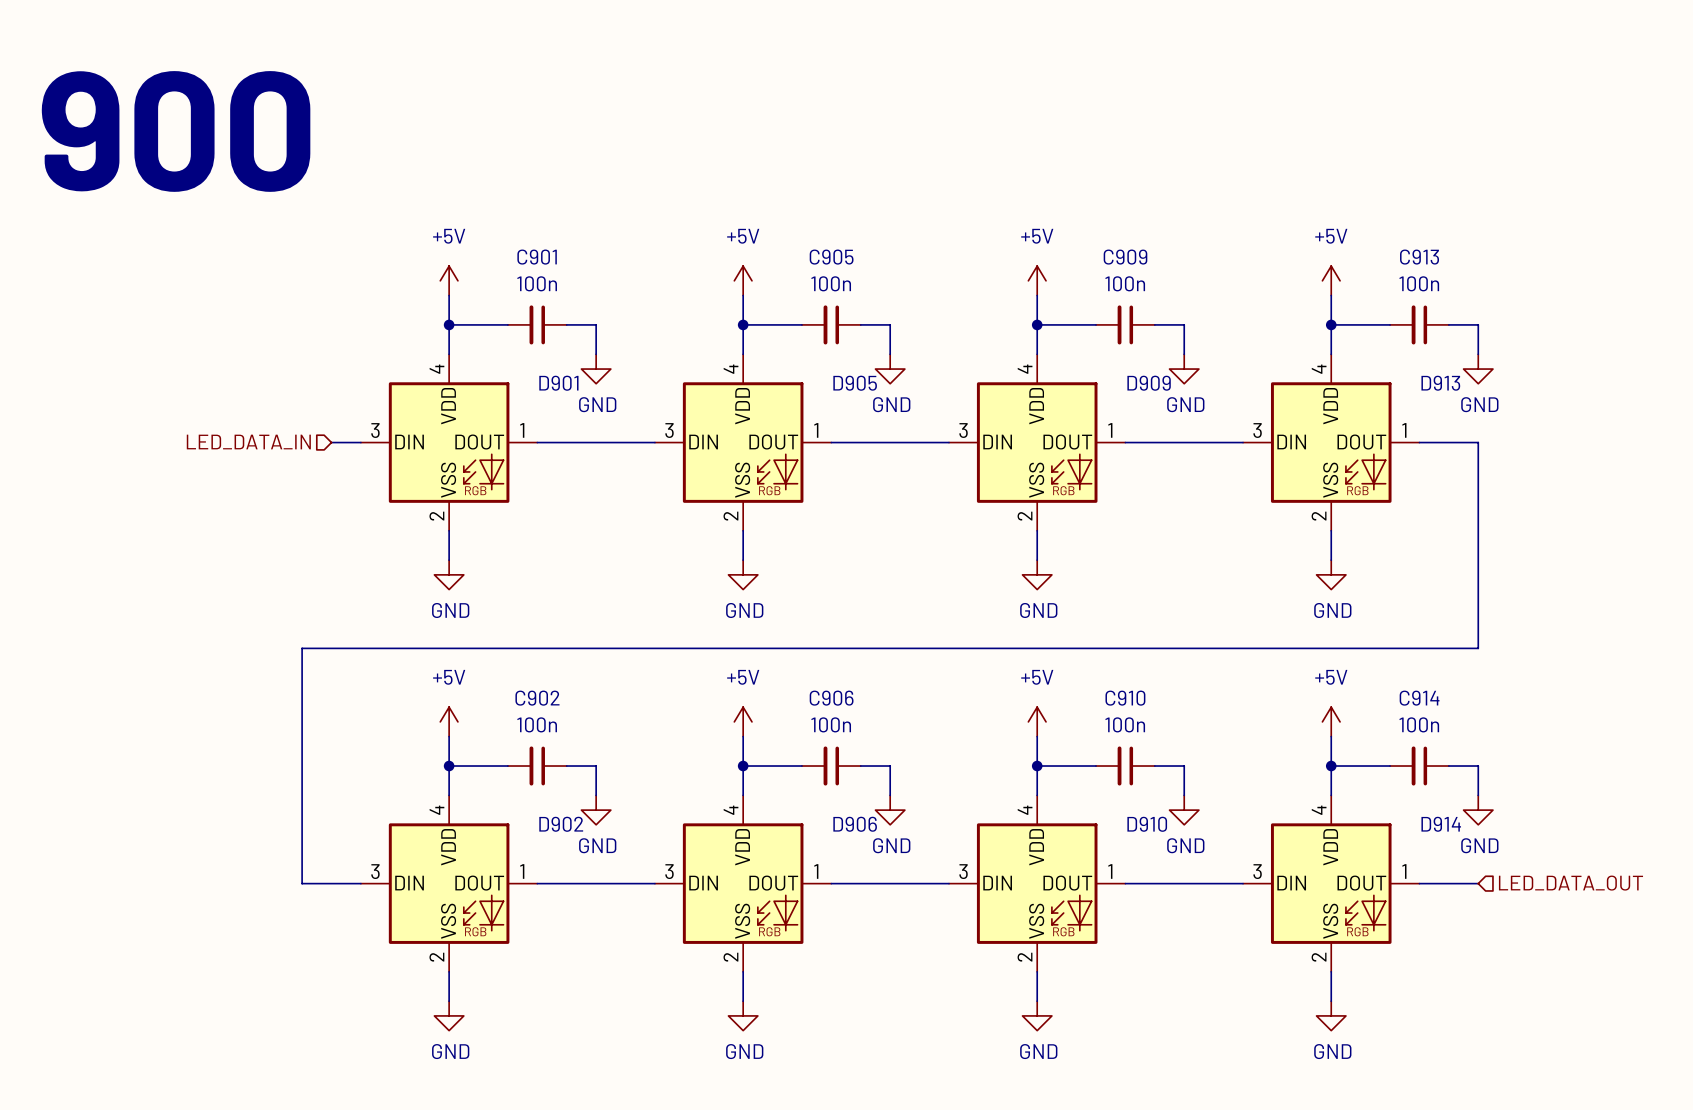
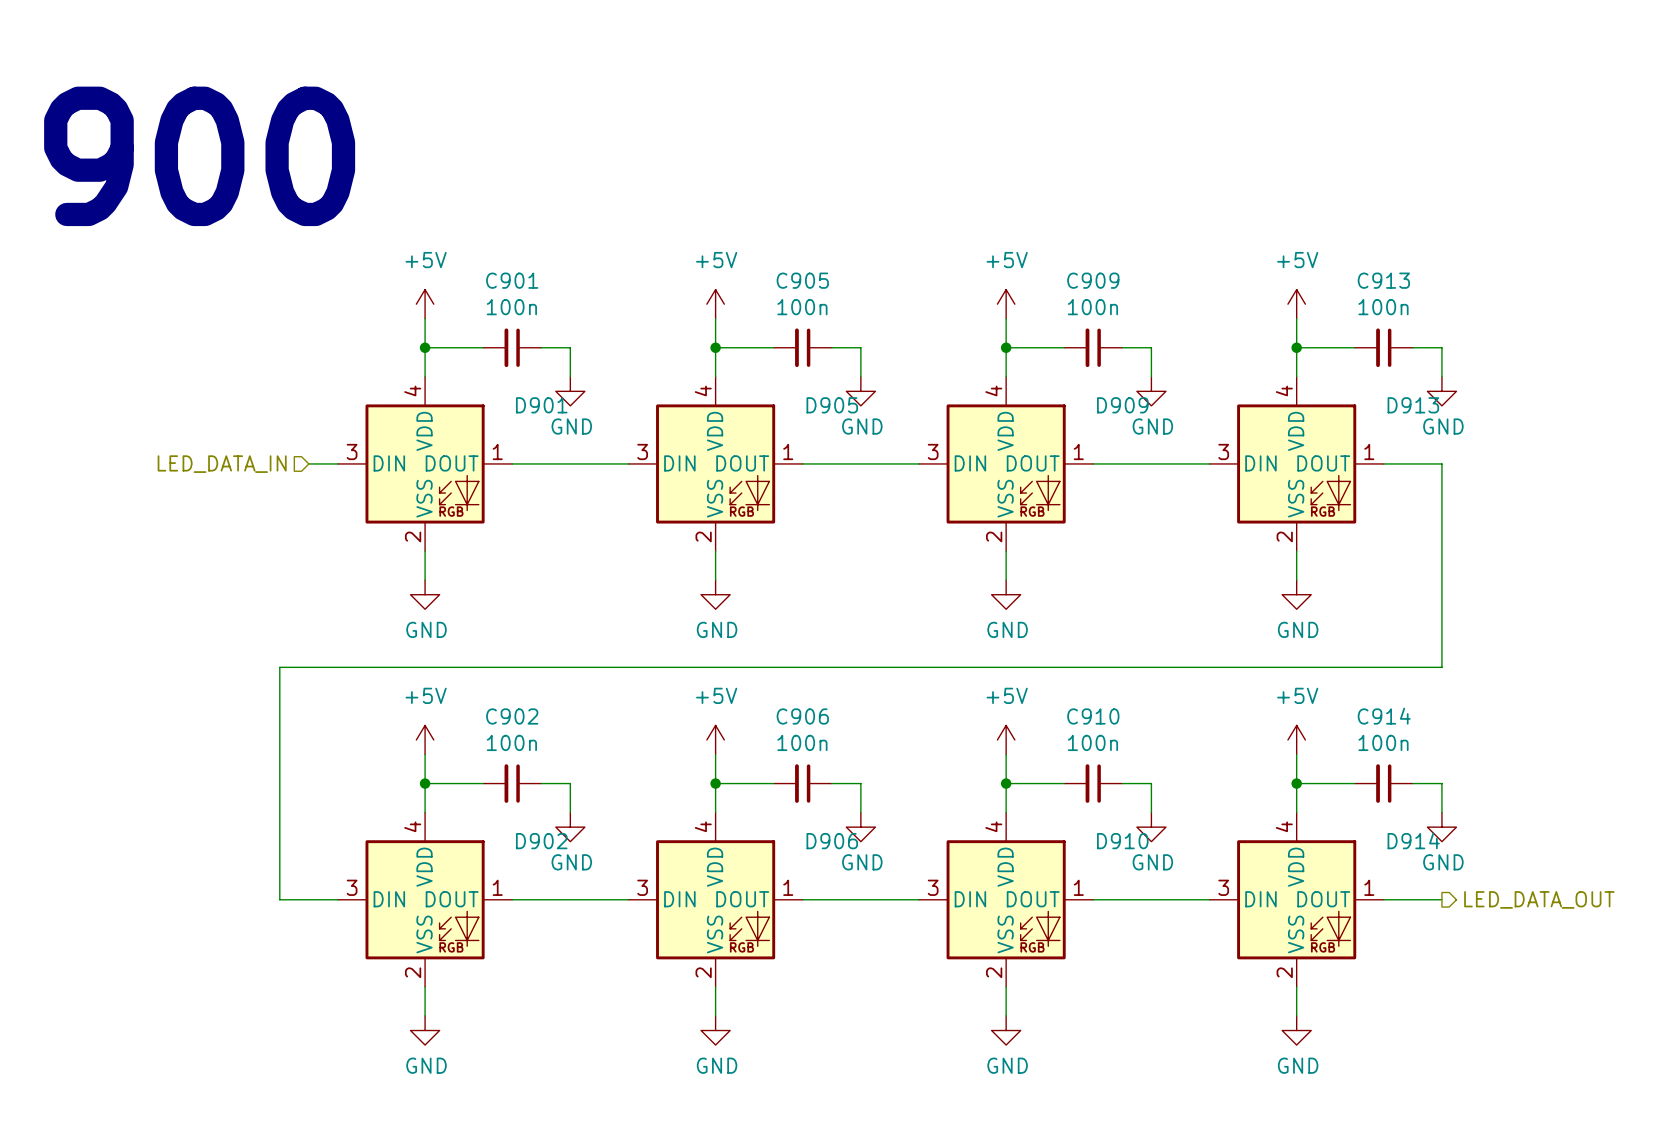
hierarchical label shape: input (1570, 883) -> output (1539, 899)

